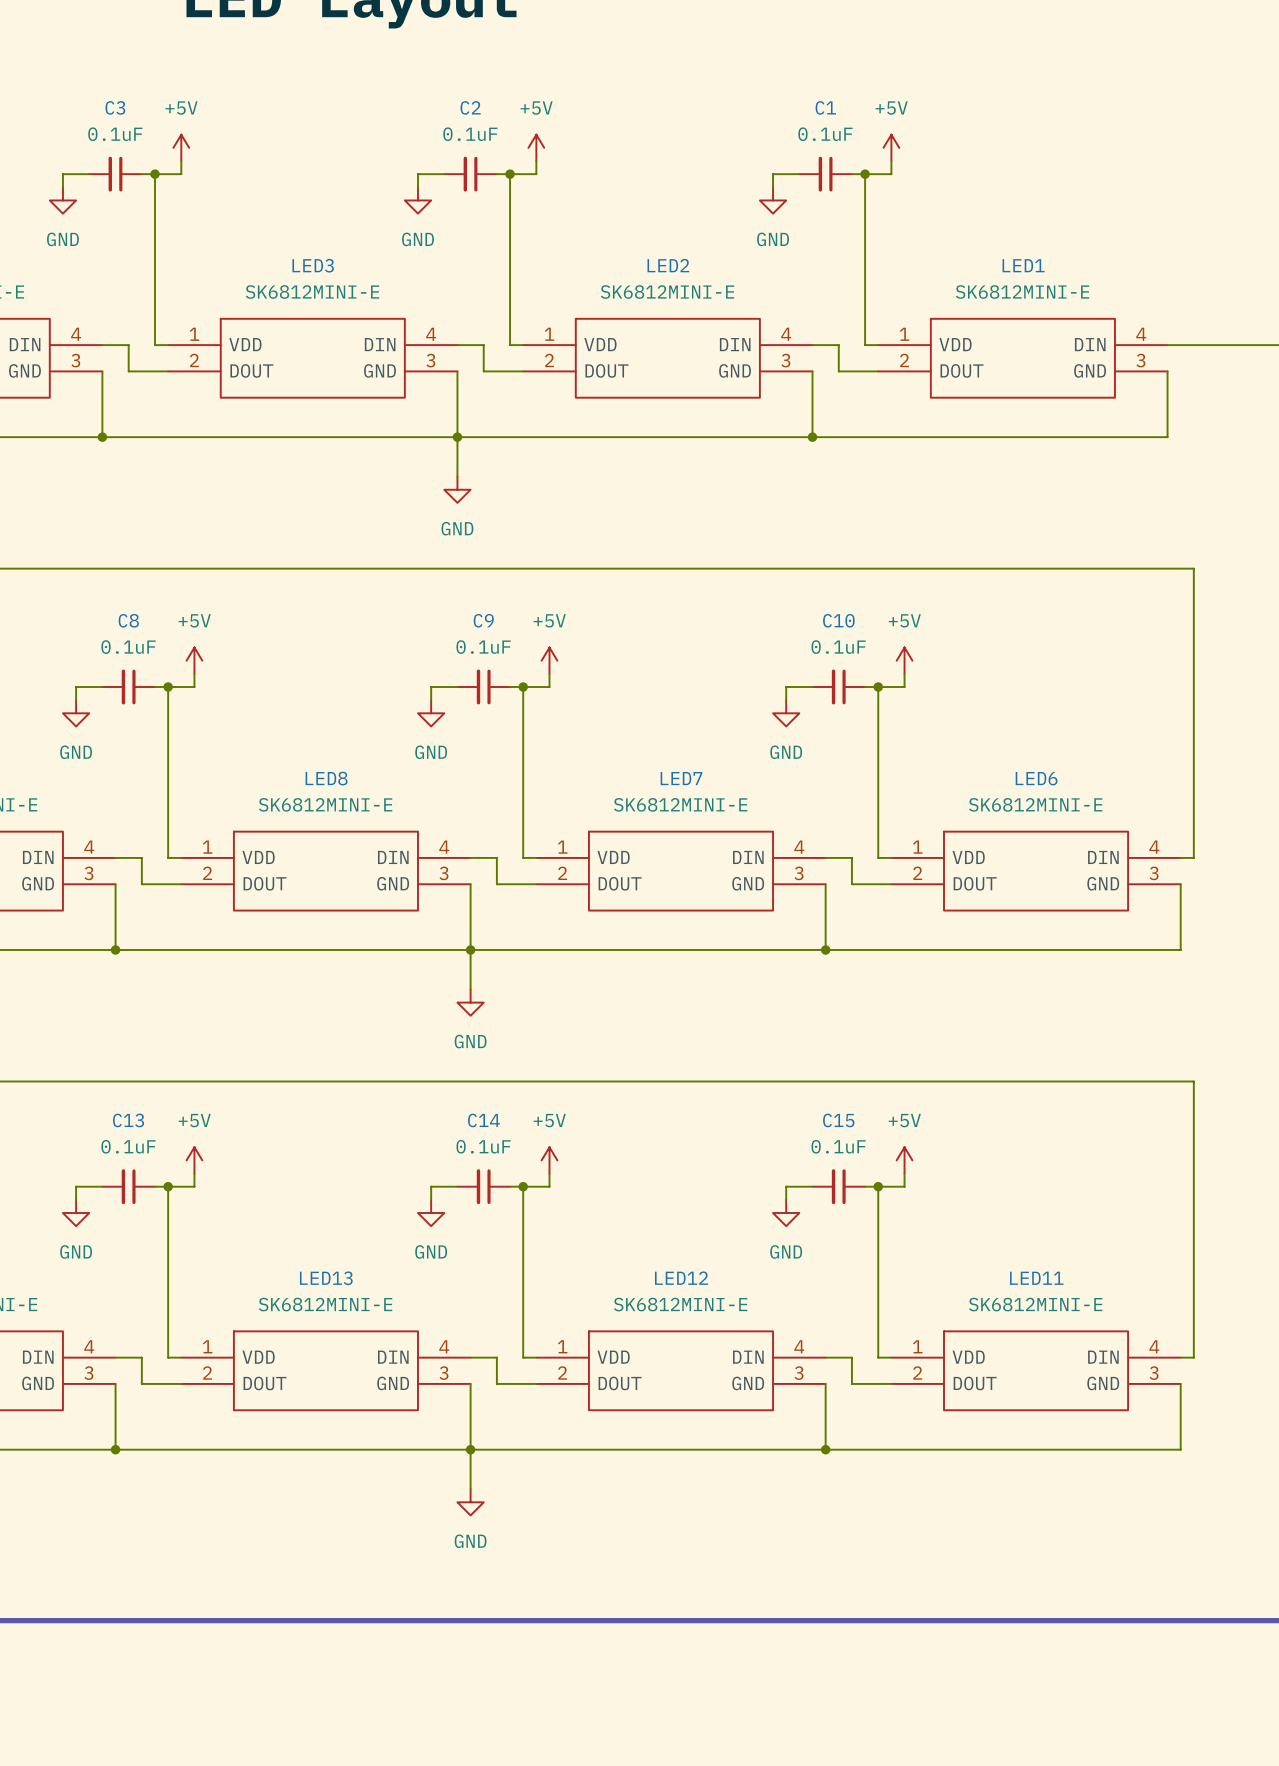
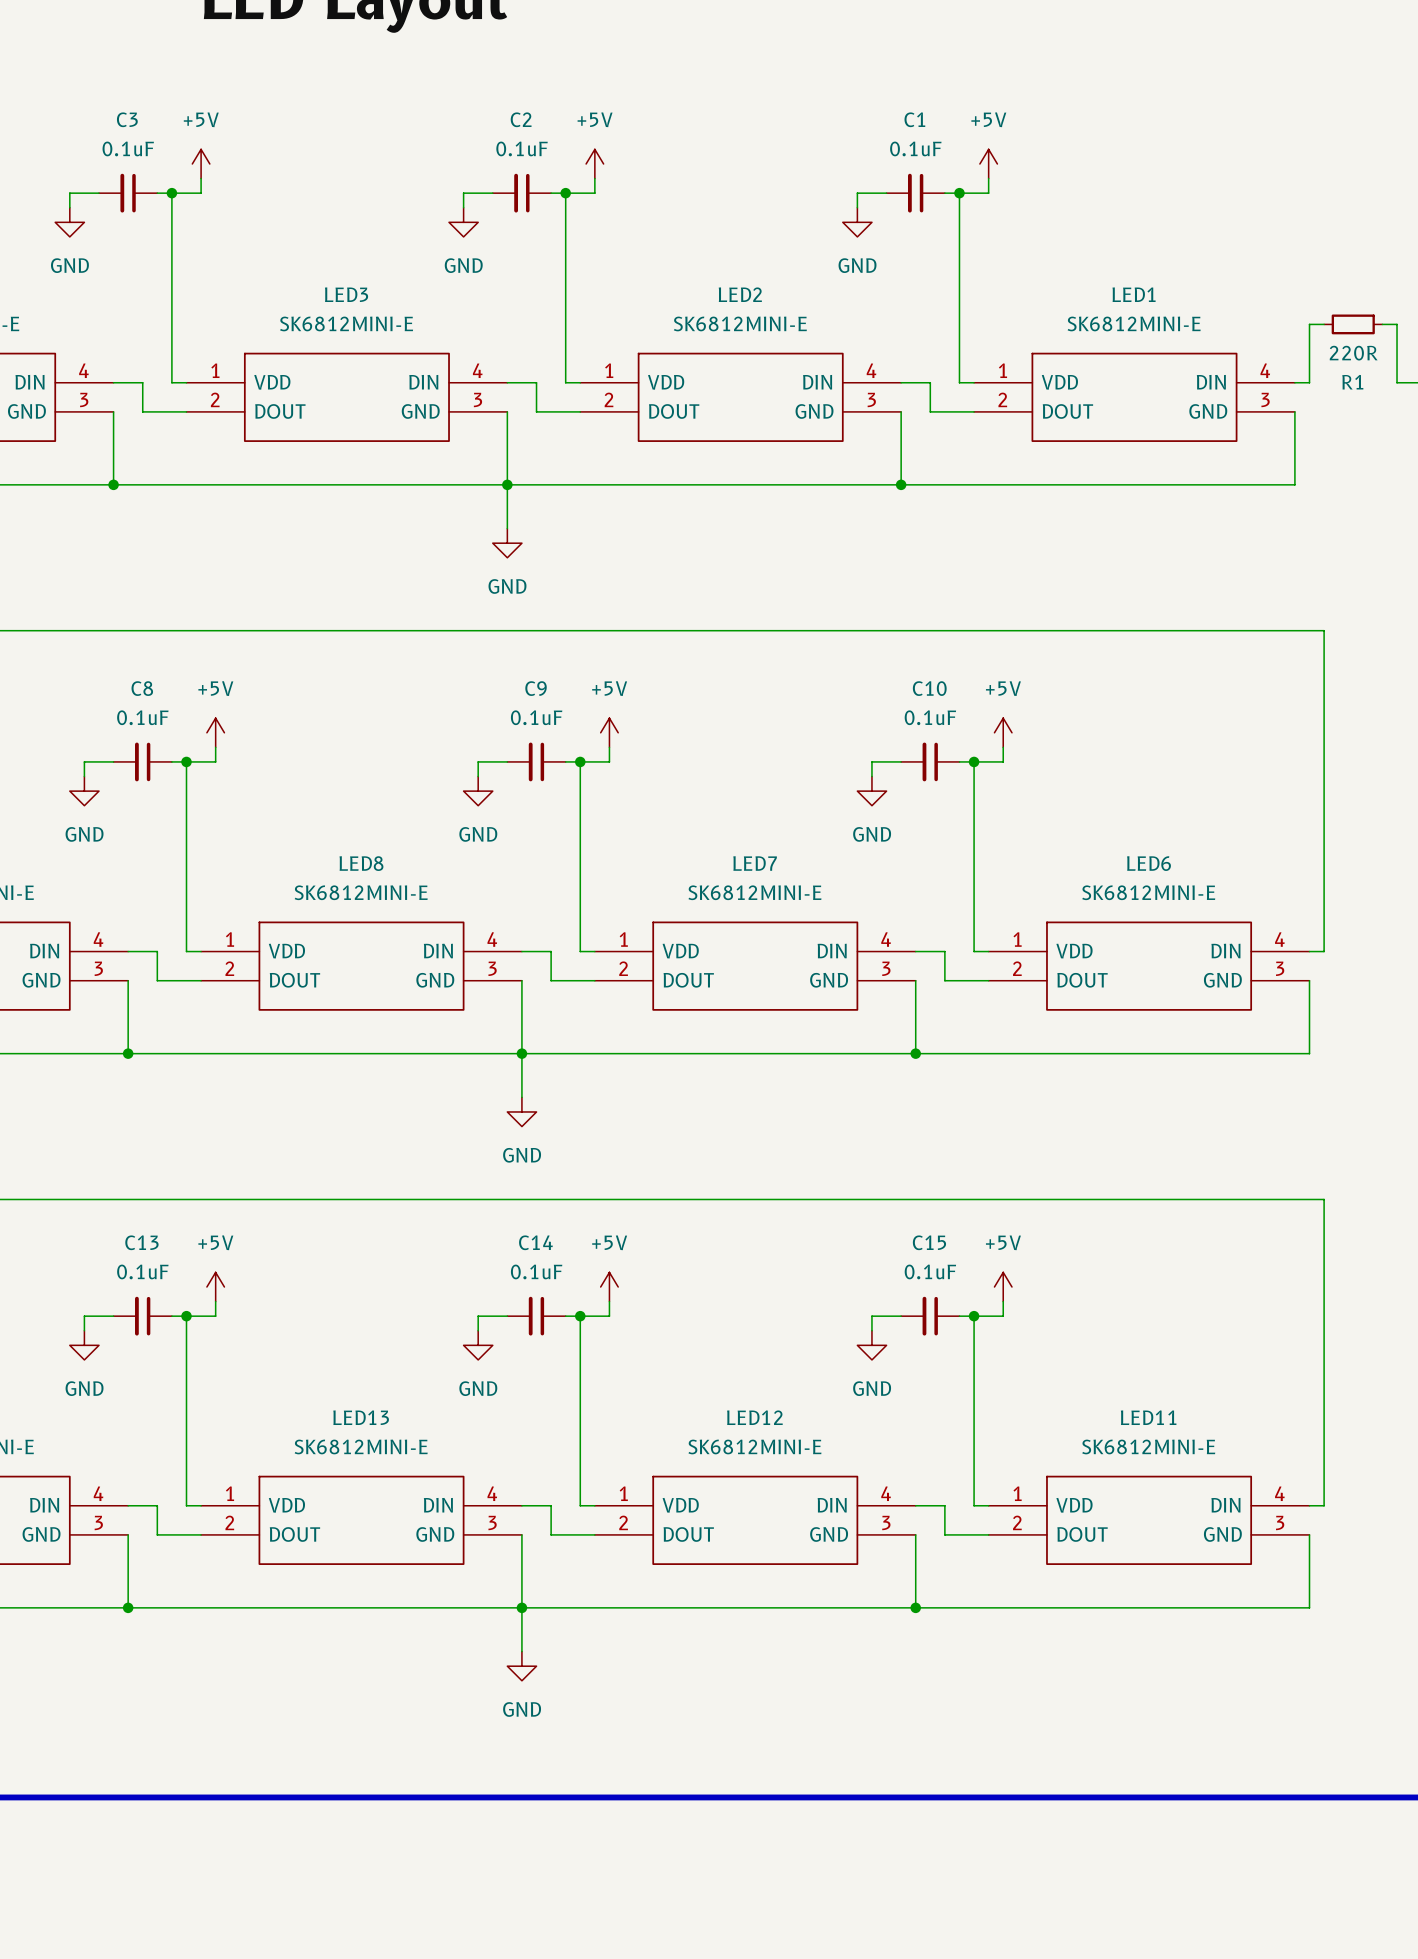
R1: none -> 220R (1353, 324)
wire: none -> (1382, 324) (1397, 324) (1397, 382)
wire: (1180, 345) (1259, 345) -> (1309, 382) (1309, 324) (1324, 324)

